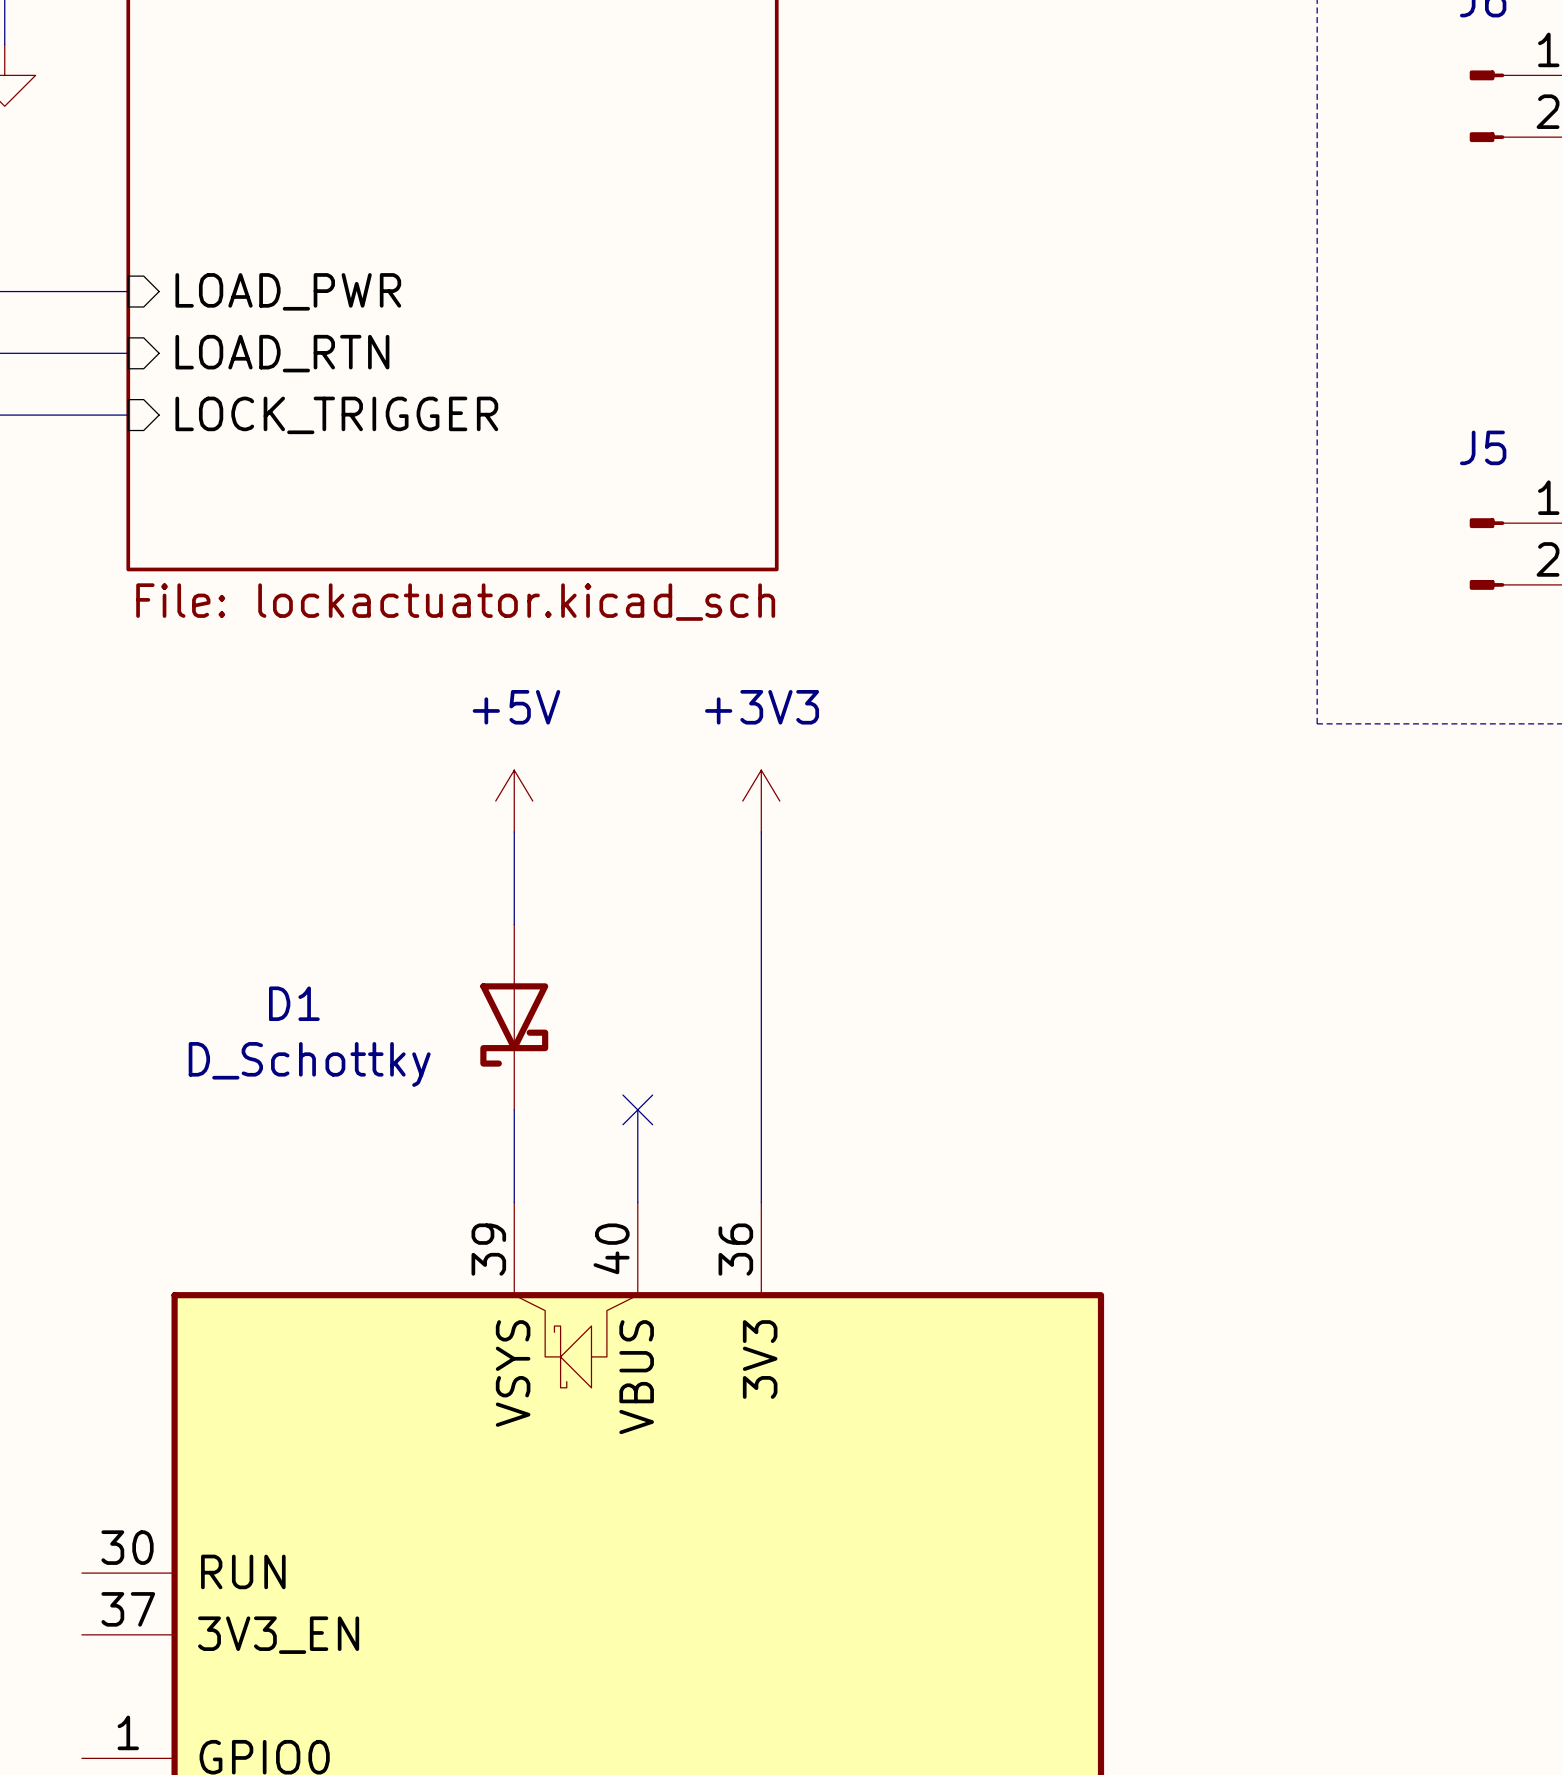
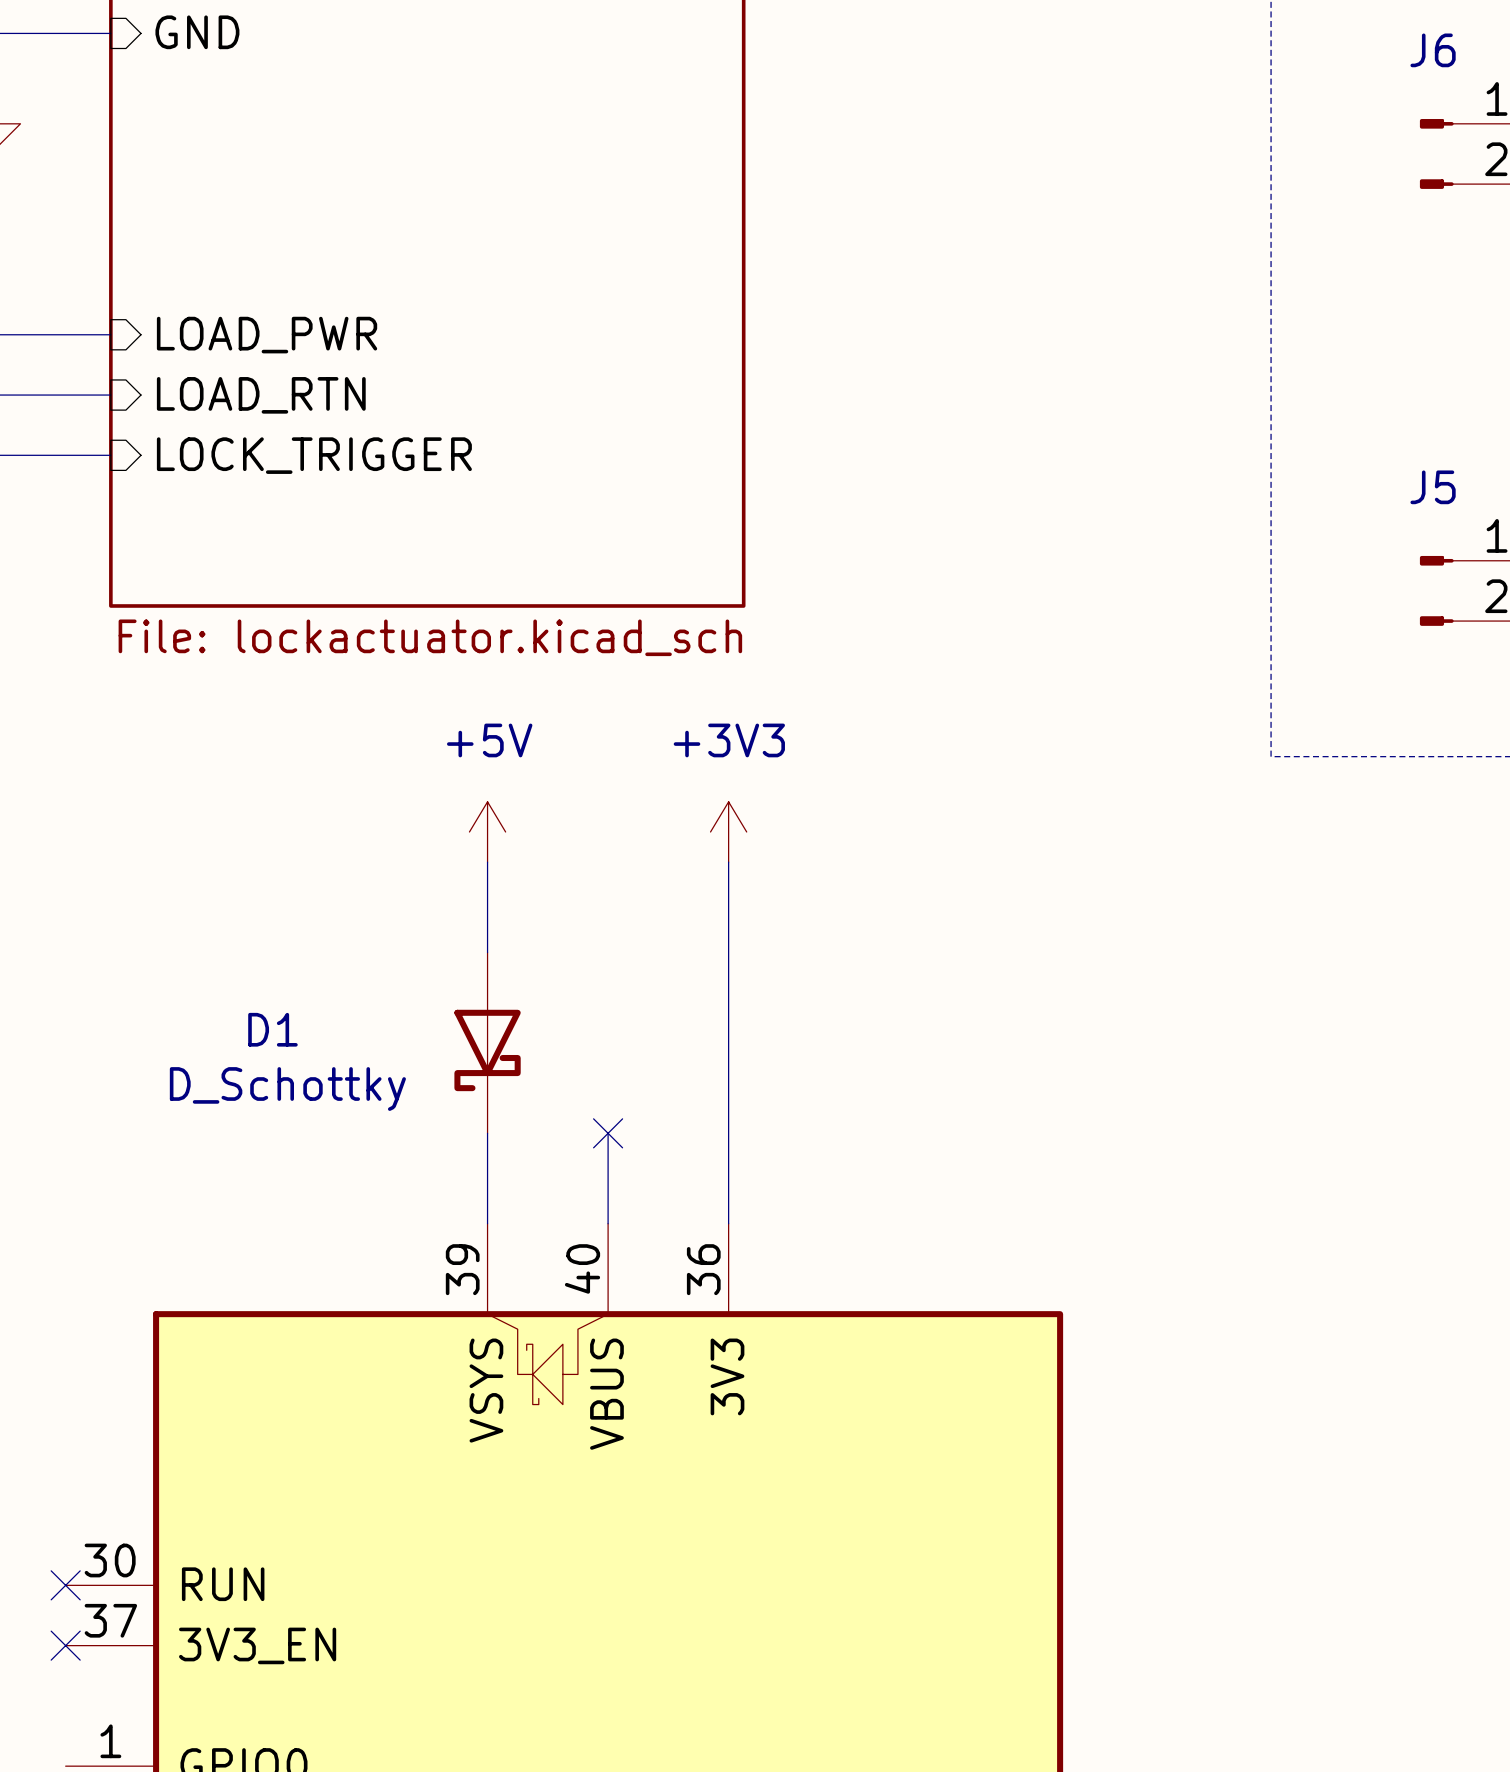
no-connect mark: none -> (65, 1585)
no-connect mark: none -> (65, 1645)

